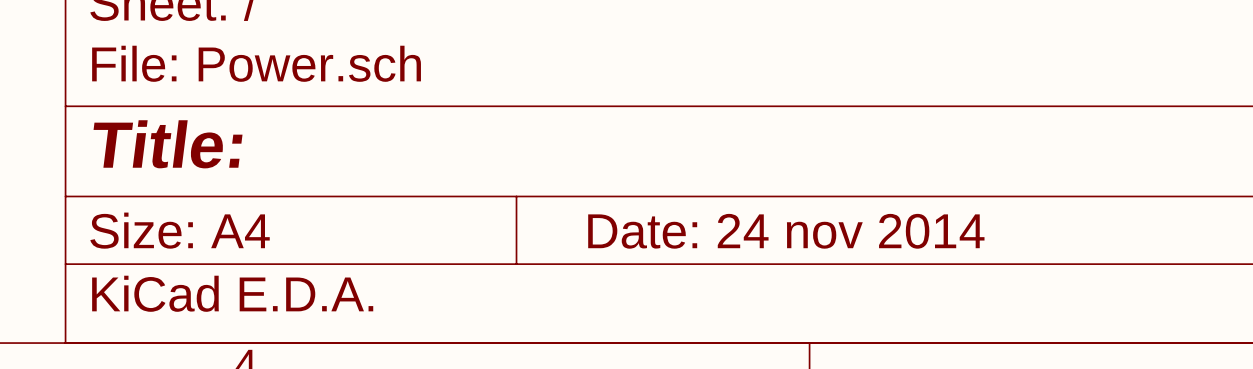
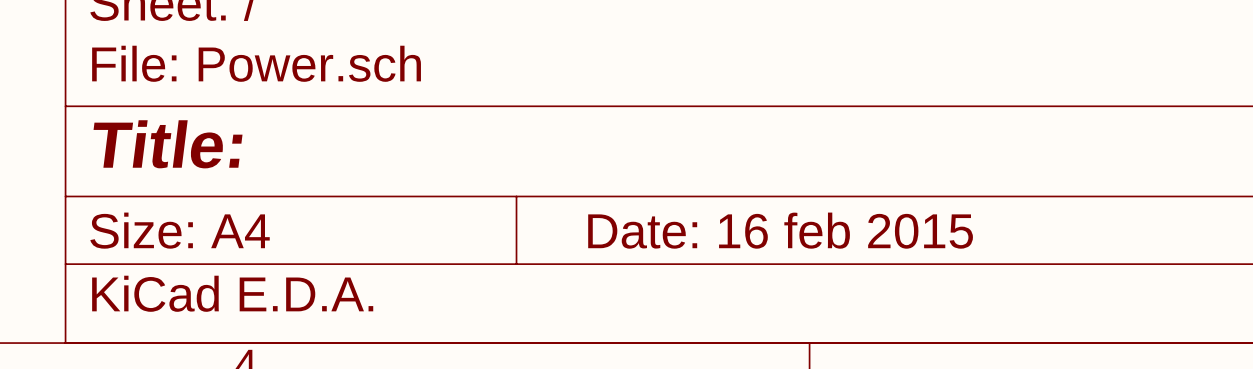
title block: Date: 24 nov 2014 (786, 231) -> Date: 16 feb 2015 (780, 230)

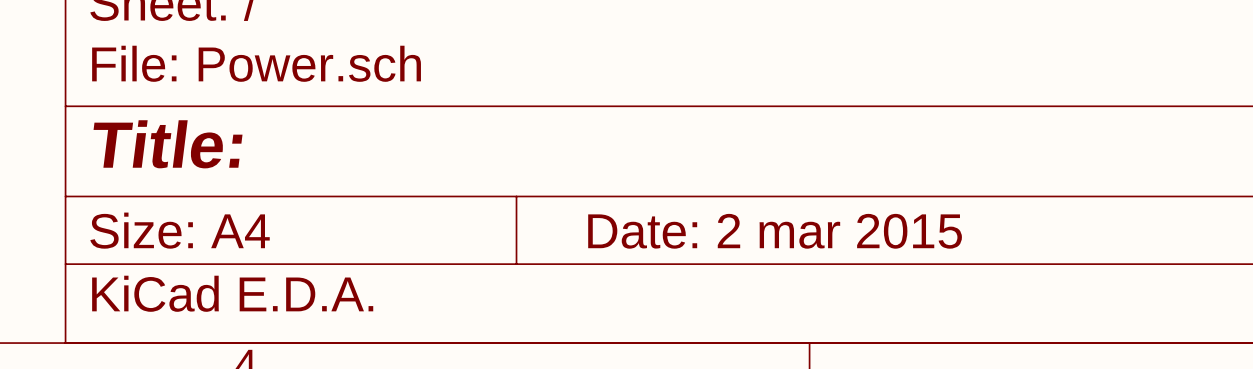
title block: Date: 16 feb 2015 (780, 230) -> Date: 2 mar 2015 (775, 231)

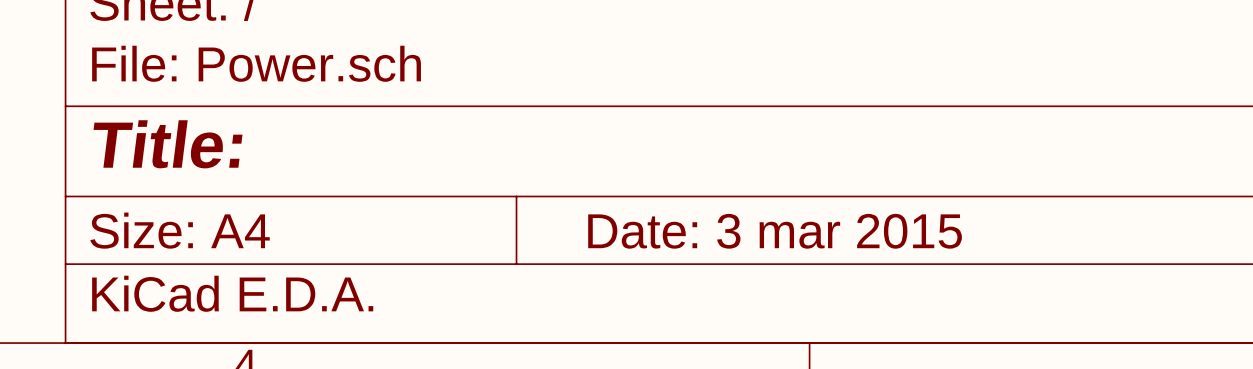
title block: Date: 2 mar 2015 (775, 231) -> Date: 3 mar 2015 (775, 231)

